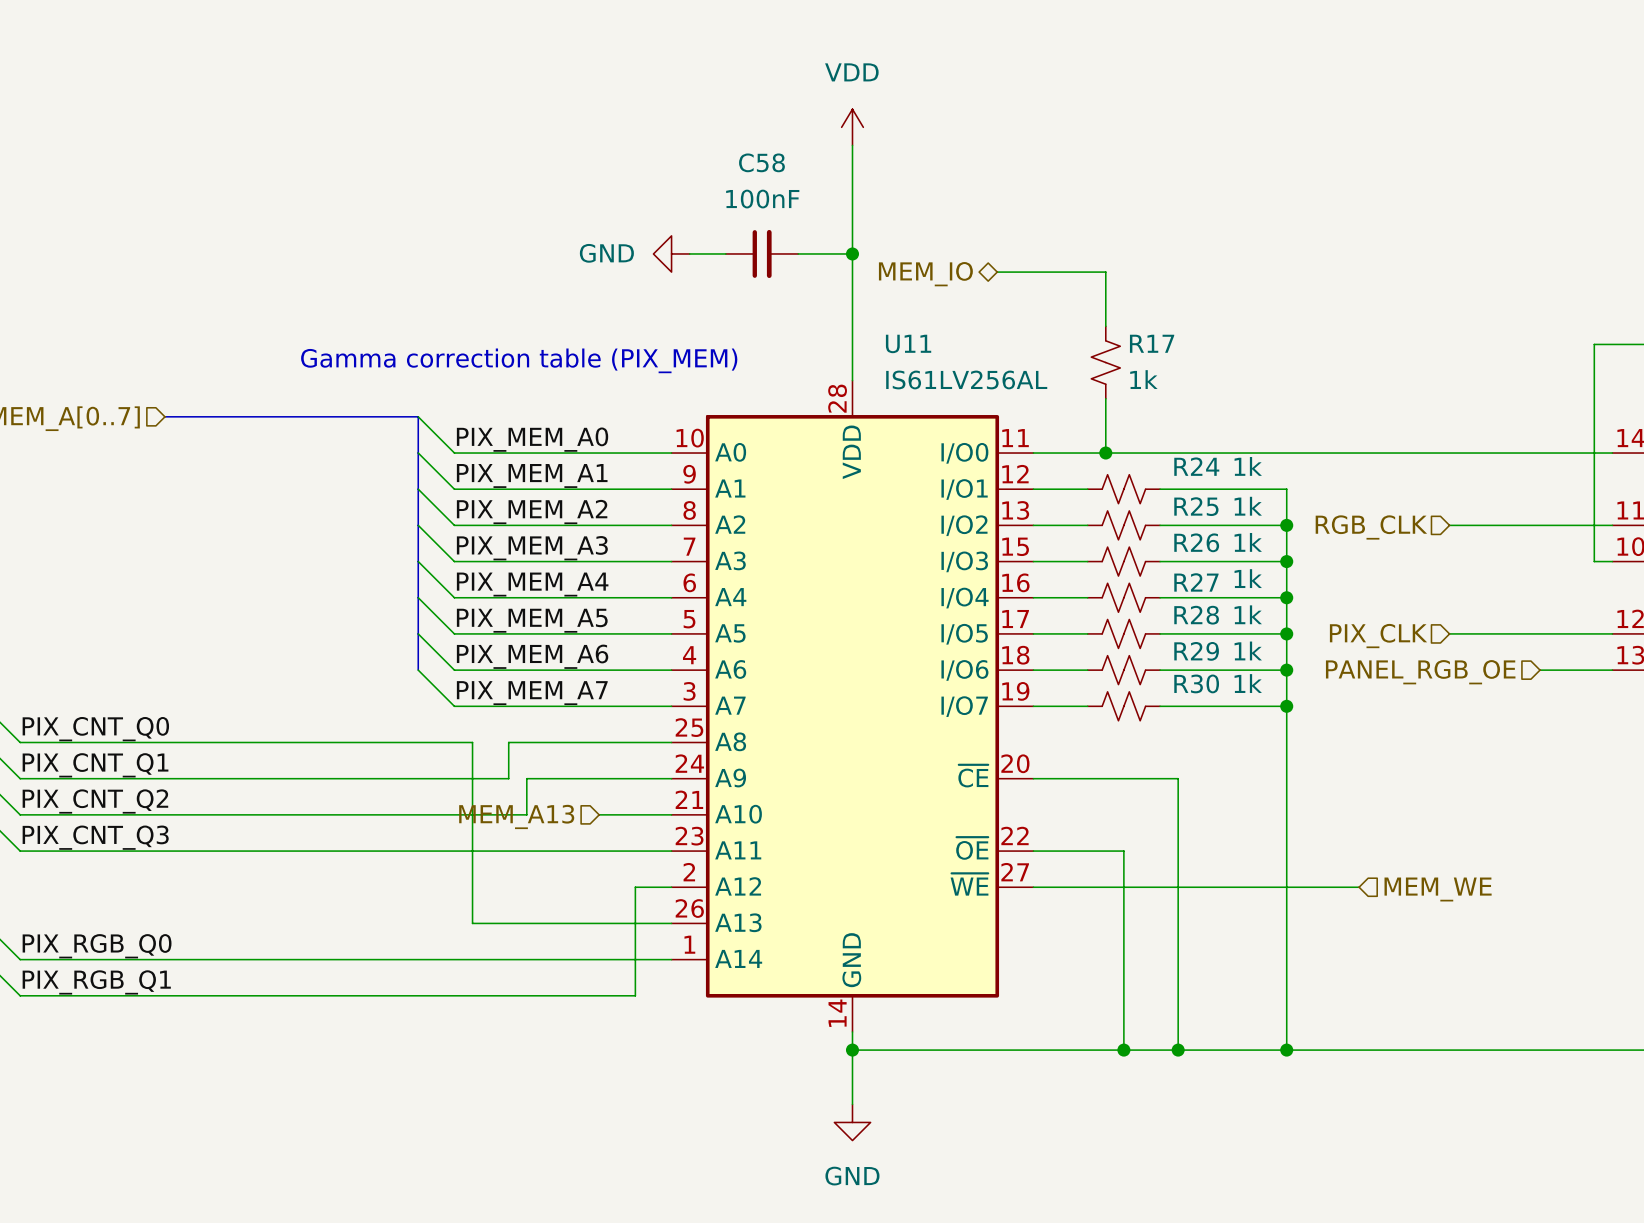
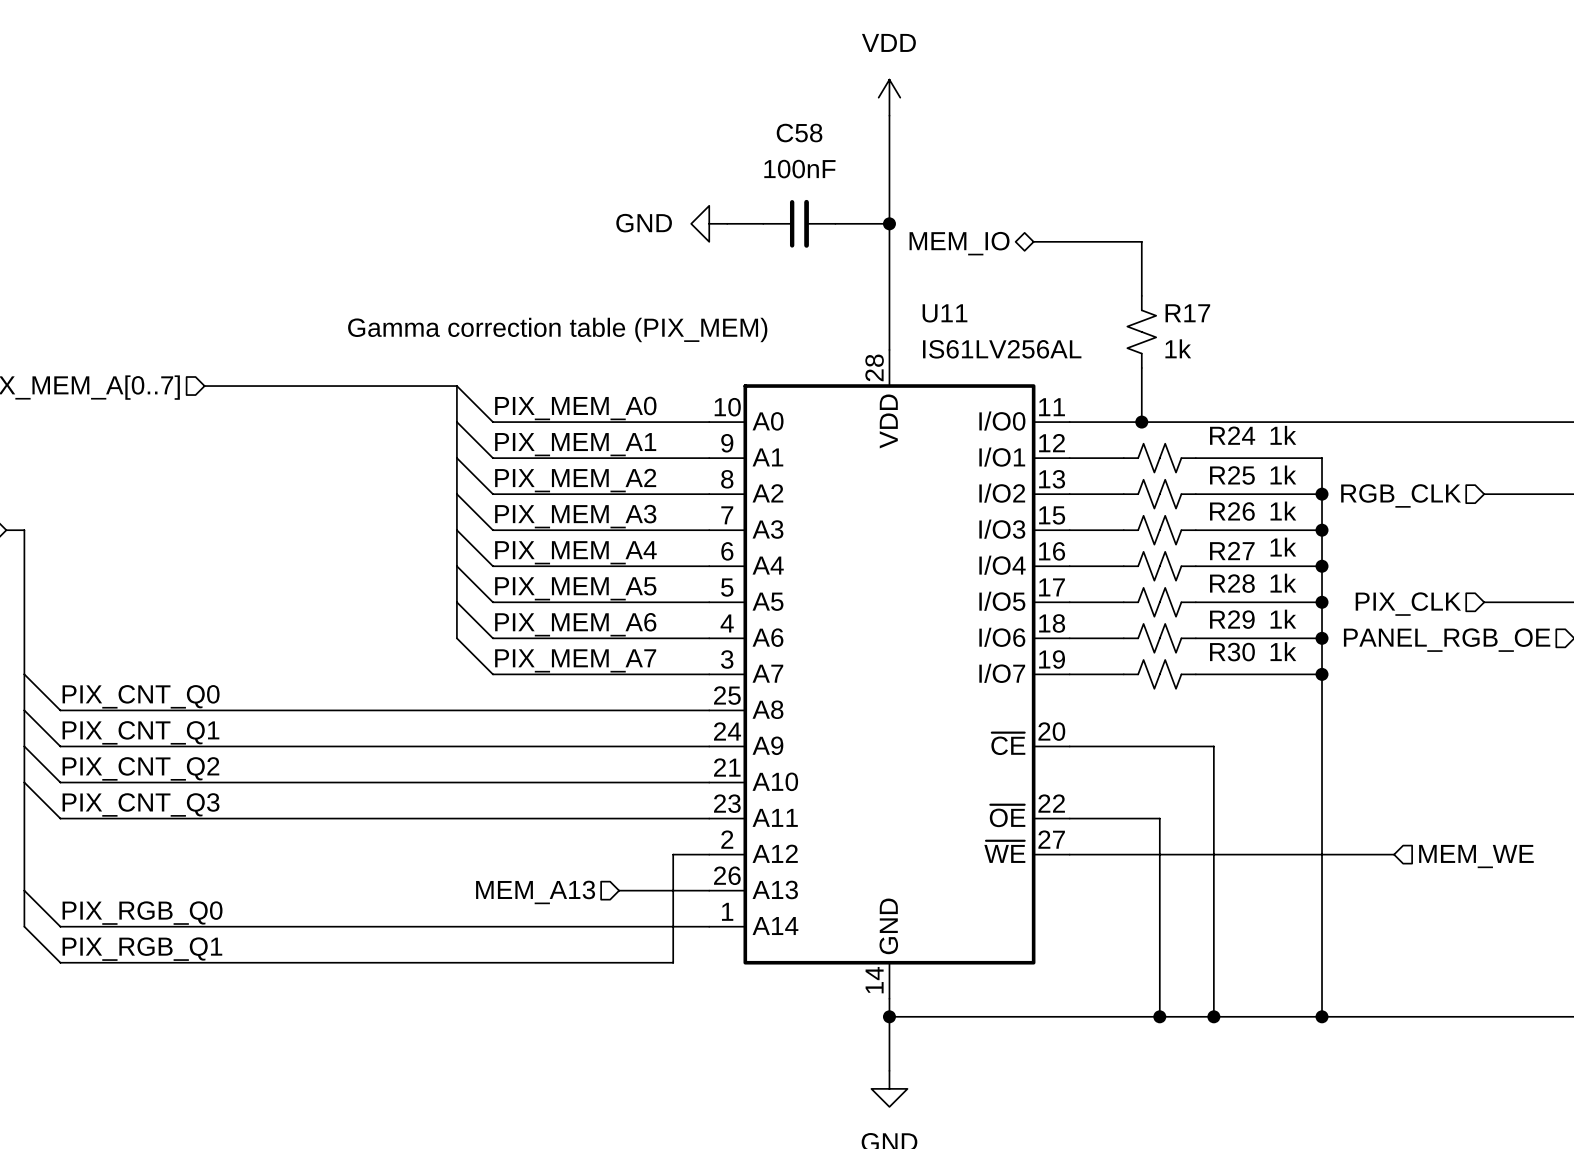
wire: (472, 742) (472, 923) (581, 923) -> (511, 710) (547, 710)
wire: (508, 742) (508, 778) -> (565, 746) (547, 746)
wire: (526, 778) (526, 814) -> (637, 782) (565, 782)
hierarchical label position: MEM_A13 (516, 816) -> MEM_A13 (535, 892)

